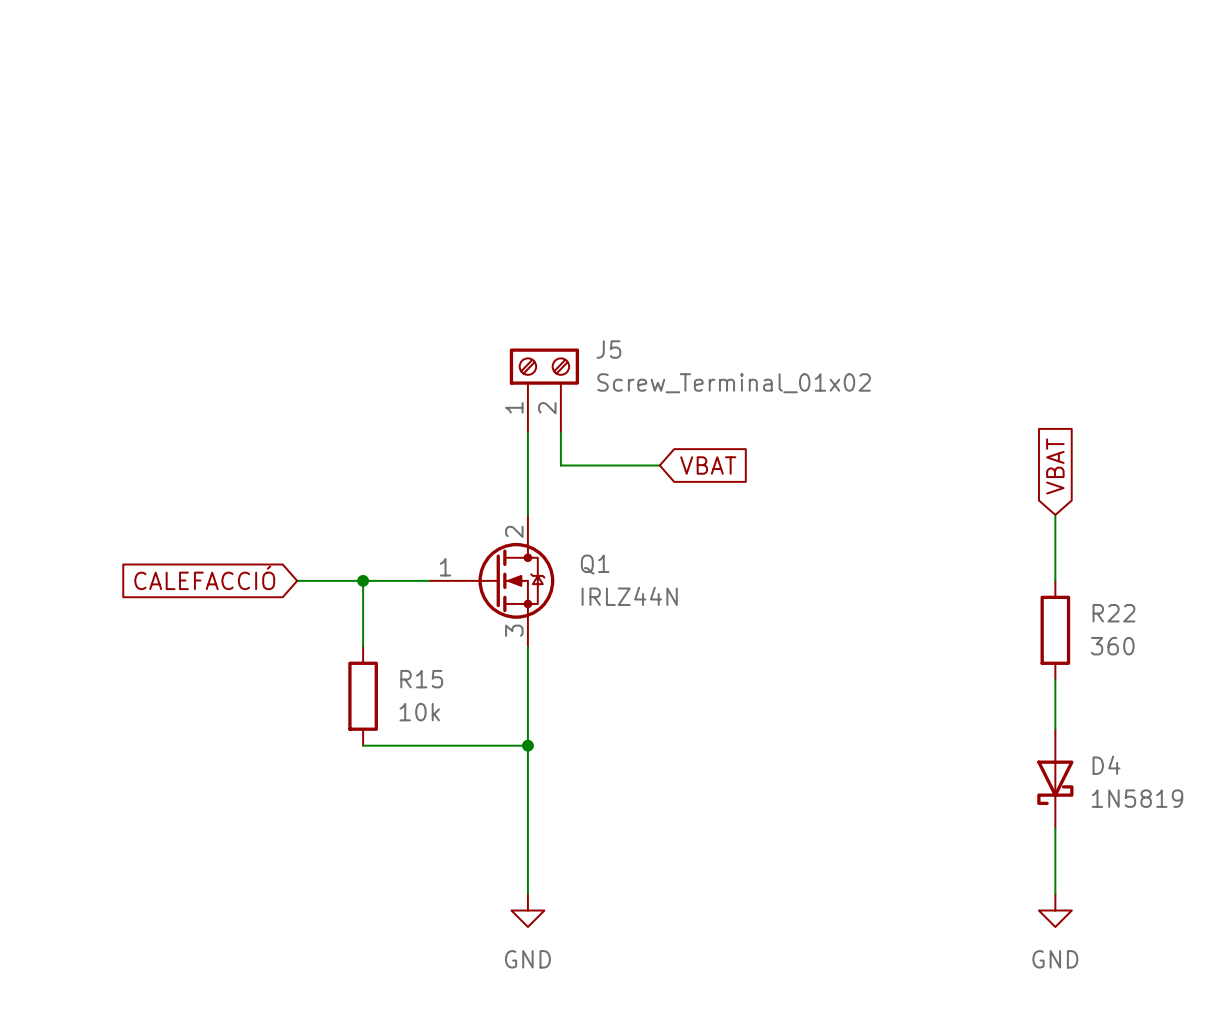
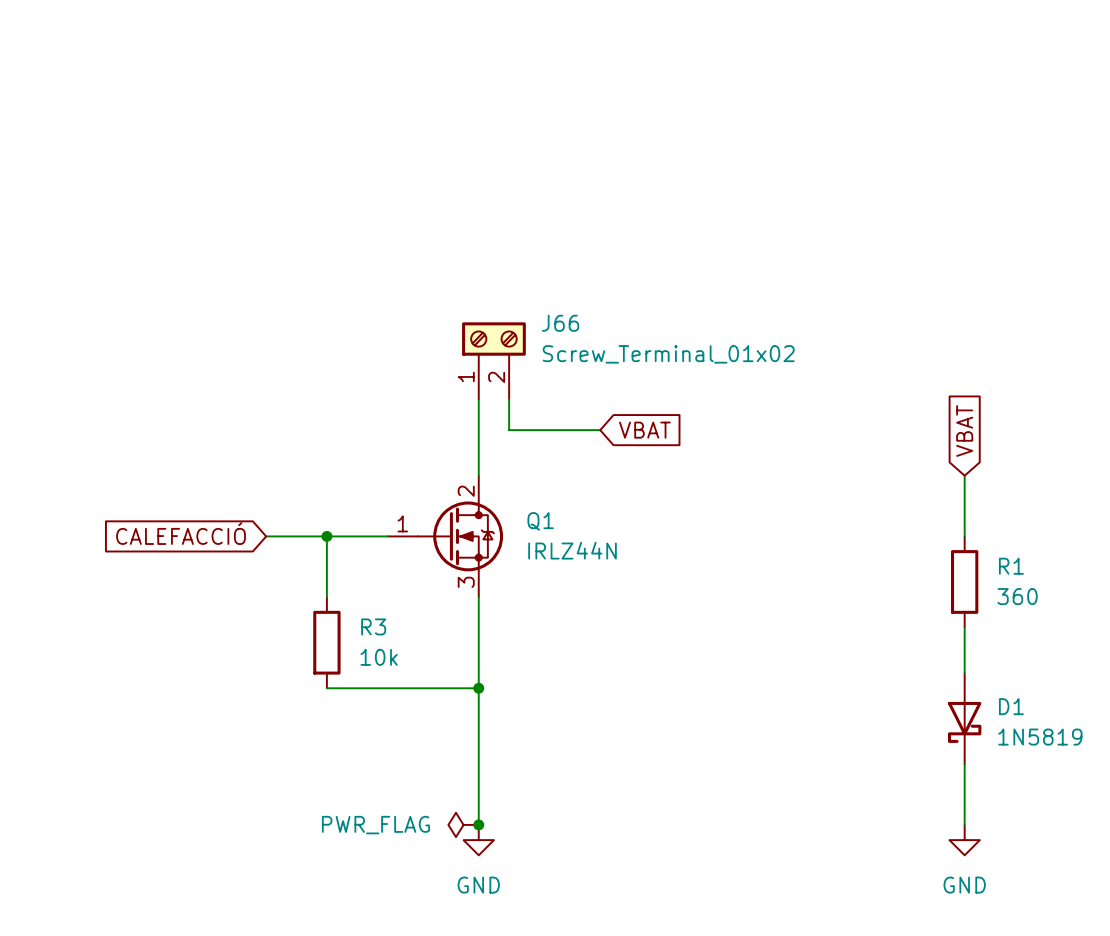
J5 name: J5 (608, 349) -> J66 (560, 323)
R22 name: R22 (1113, 613) -> R1 (1011, 566)
R15 name: R15 (421, 679) -> R3 (373, 626)
D4 name: D4 (1106, 765) -> D1 (1011, 706)
power symbol: none -> PWR_FLAG (463, 824)
junction: none -> (478, 824)

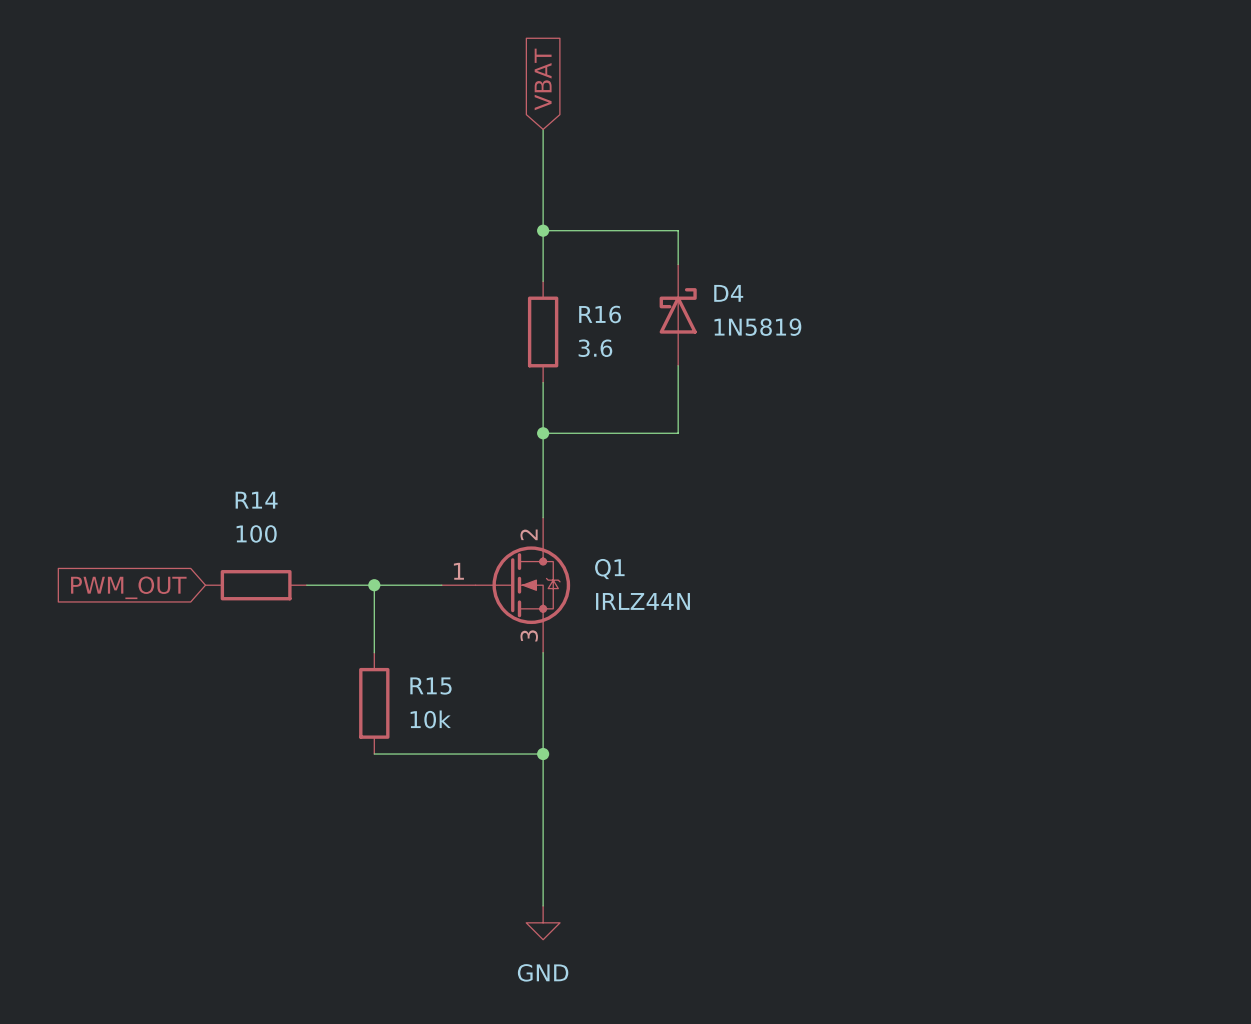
global label: none -> VBAT (543, 79)
wire: none -> (543, 129) (543, 281)
wire: none -> (543, 230) (678, 230) (678, 264)
junction: none -> (543, 230)
D4: none -> 1N5819 (678, 315)
R16: none -> 3.6 (543, 331)
wire: none -> (678, 365) (678, 433) (543, 433) (543, 382)
J66: Screw_Terminal_01x02 (493, 361) -> none
junction: none -> (543, 433)
wire: (509, 399) (509, 430) (600, 430) -> none
global label: VBAT (644, 430) -> none
global label: VBAT (964, 431) -> none
wire: (964, 475) (964, 536) -> none
global label: CALEFACCIÓ (181, 533) -> none
R14: none -> 100 (256, 585)
global label: none -> PWM_OUT (128, 587)
R1: 360 (964, 581) -> none
R3 name: R3 (373, 626) -> R15 (430, 686)
wire: (964, 627) (964, 673) -> none
D1: 1N5819 (964, 718) -> none
wire: (964, 764) (964, 824) -> none
power symbol: PWR_FLAG (463, 824) -> none
junction: (478, 824) -> none
power symbol: GND (964, 840) -> none

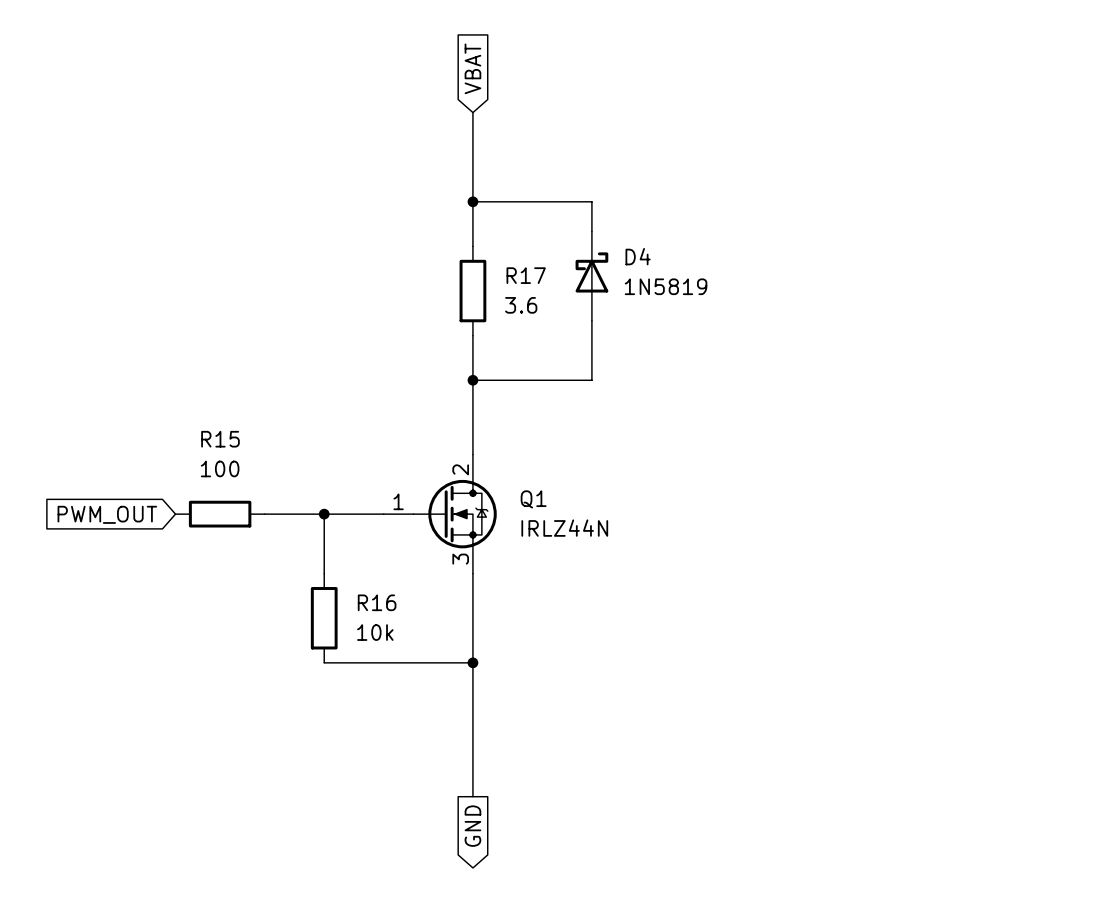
R16 name: R16 (600, 314) -> R17 (526, 275)
R14 name: R14 (256, 500) -> R15 (220, 439)
R15 name: R15 (430, 686) -> R16 (377, 602)
power symbol: GND (543, 922) -> none
global label: none -> GND (472, 826)

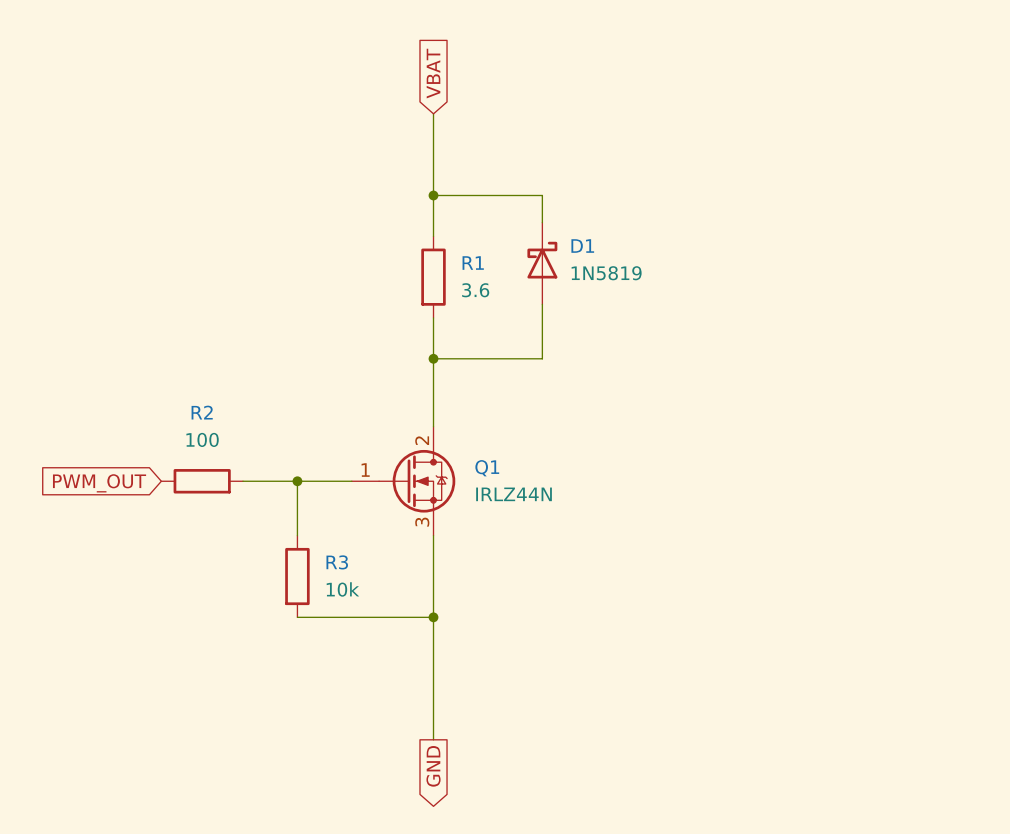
D4 name: D4 (638, 256) -> D1 (582, 246)
R17 name: R17 (526, 275) -> R1 (473, 263)
R15 name: R15 (220, 439) -> R2 (202, 412)
R16 name: R16 (377, 602) -> R3 (337, 562)

